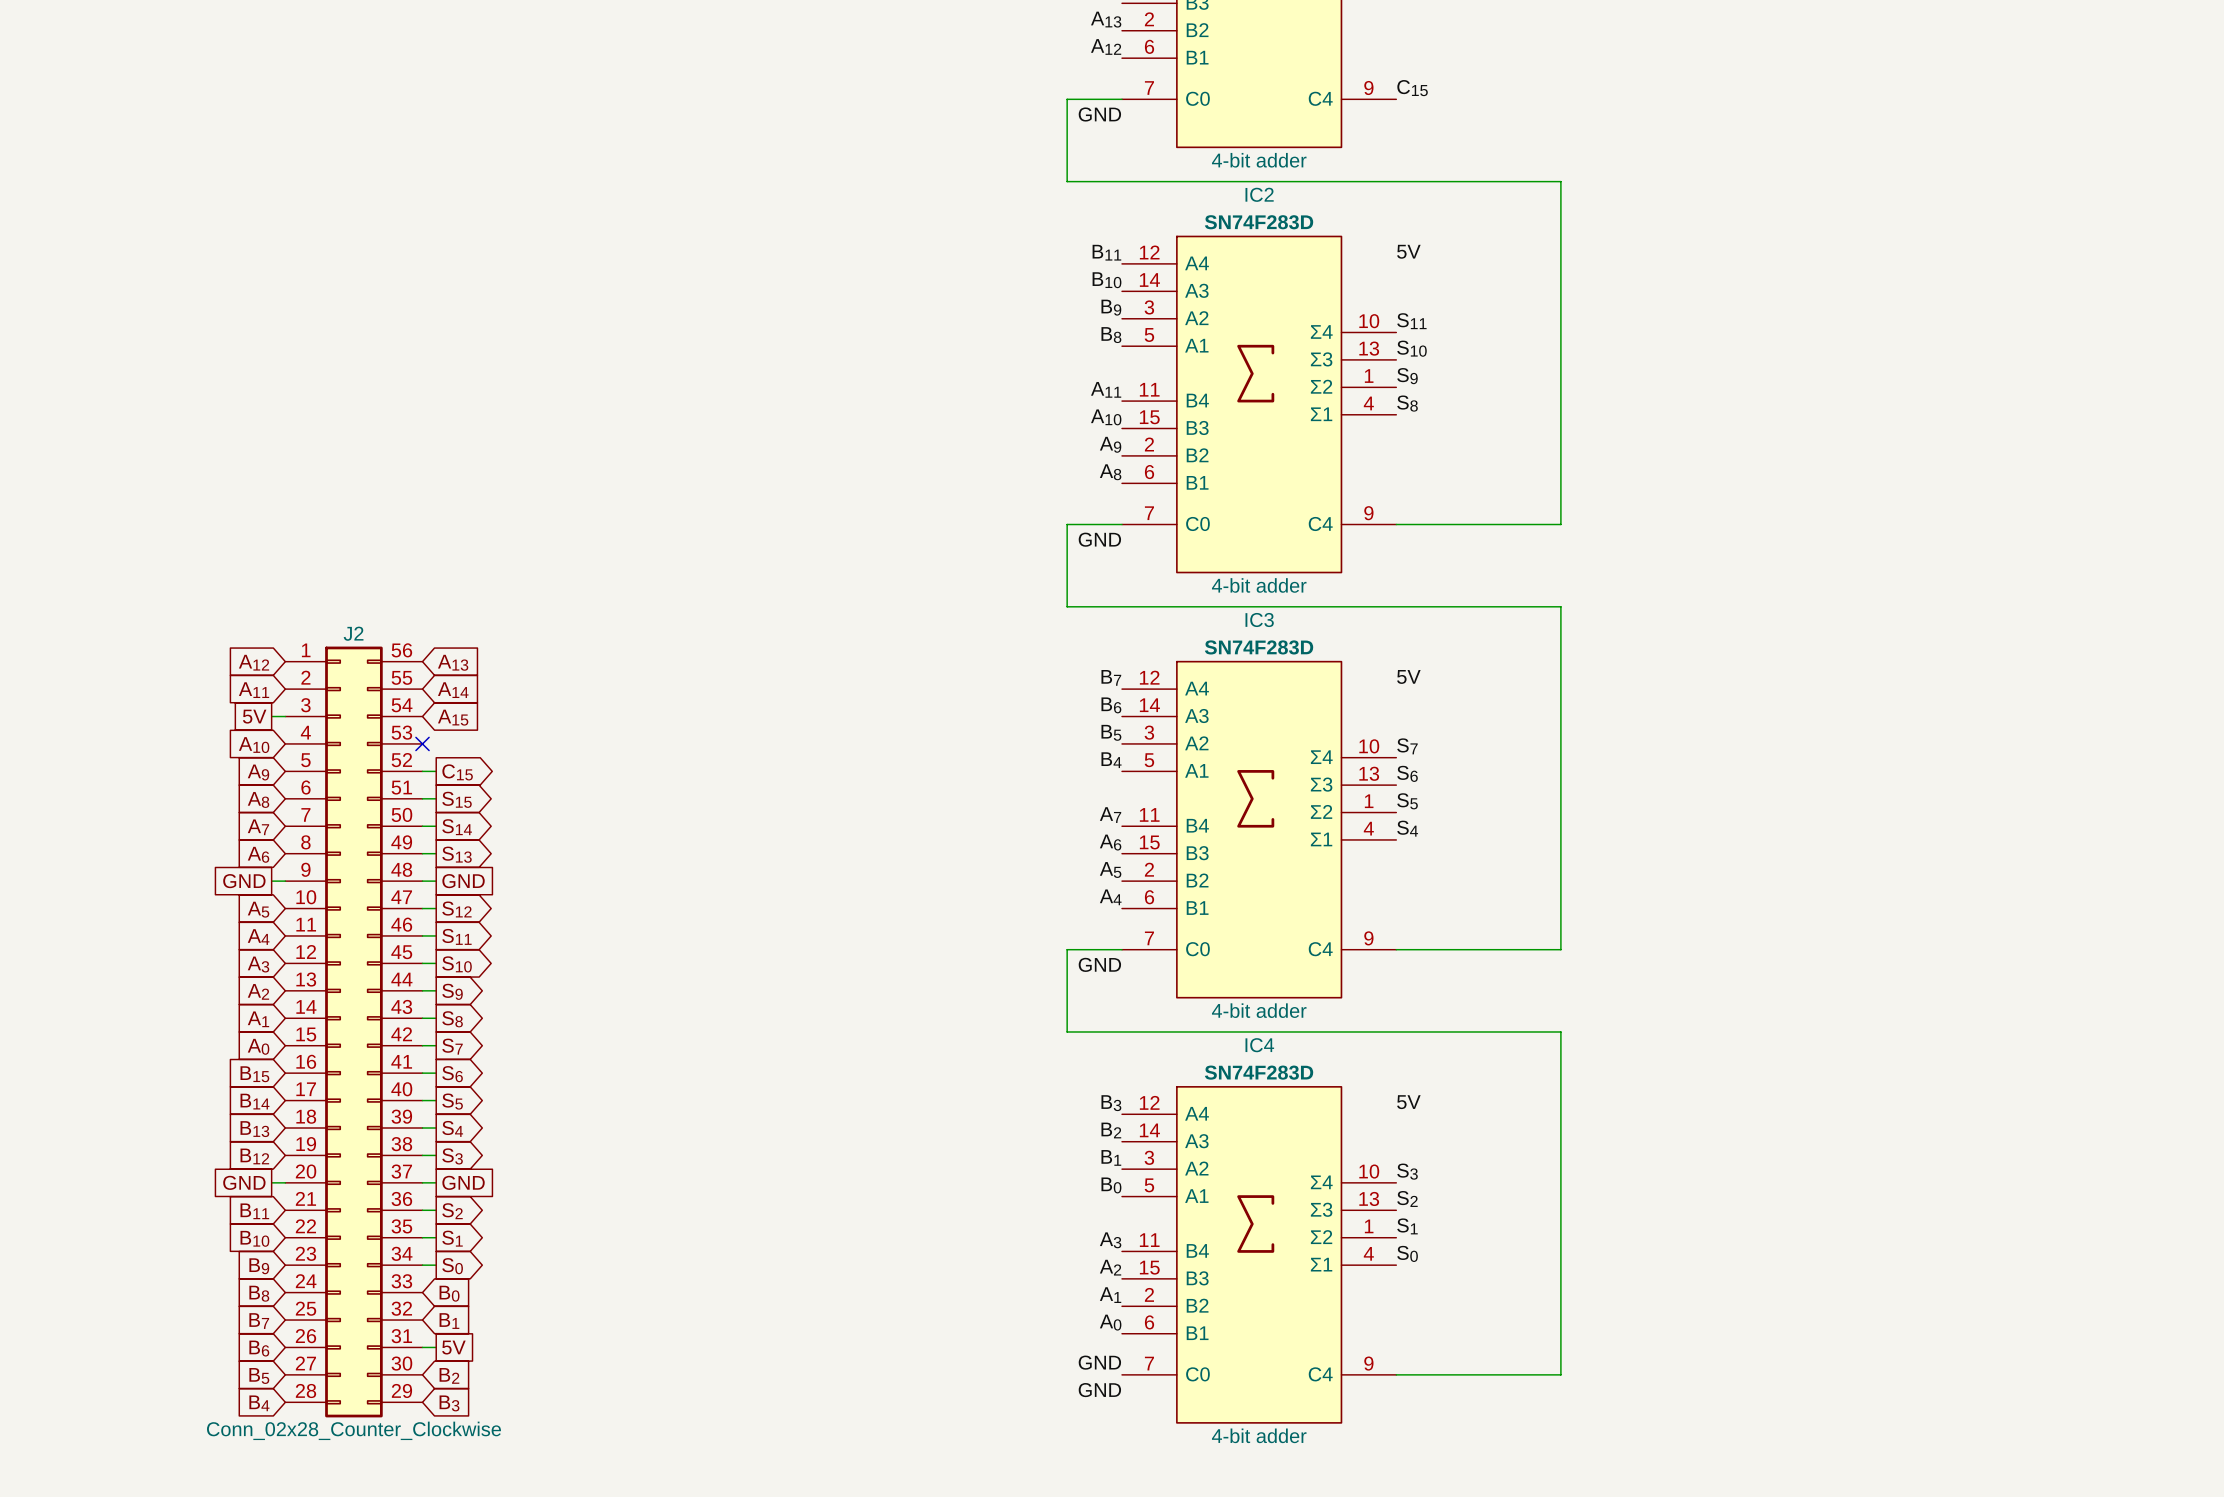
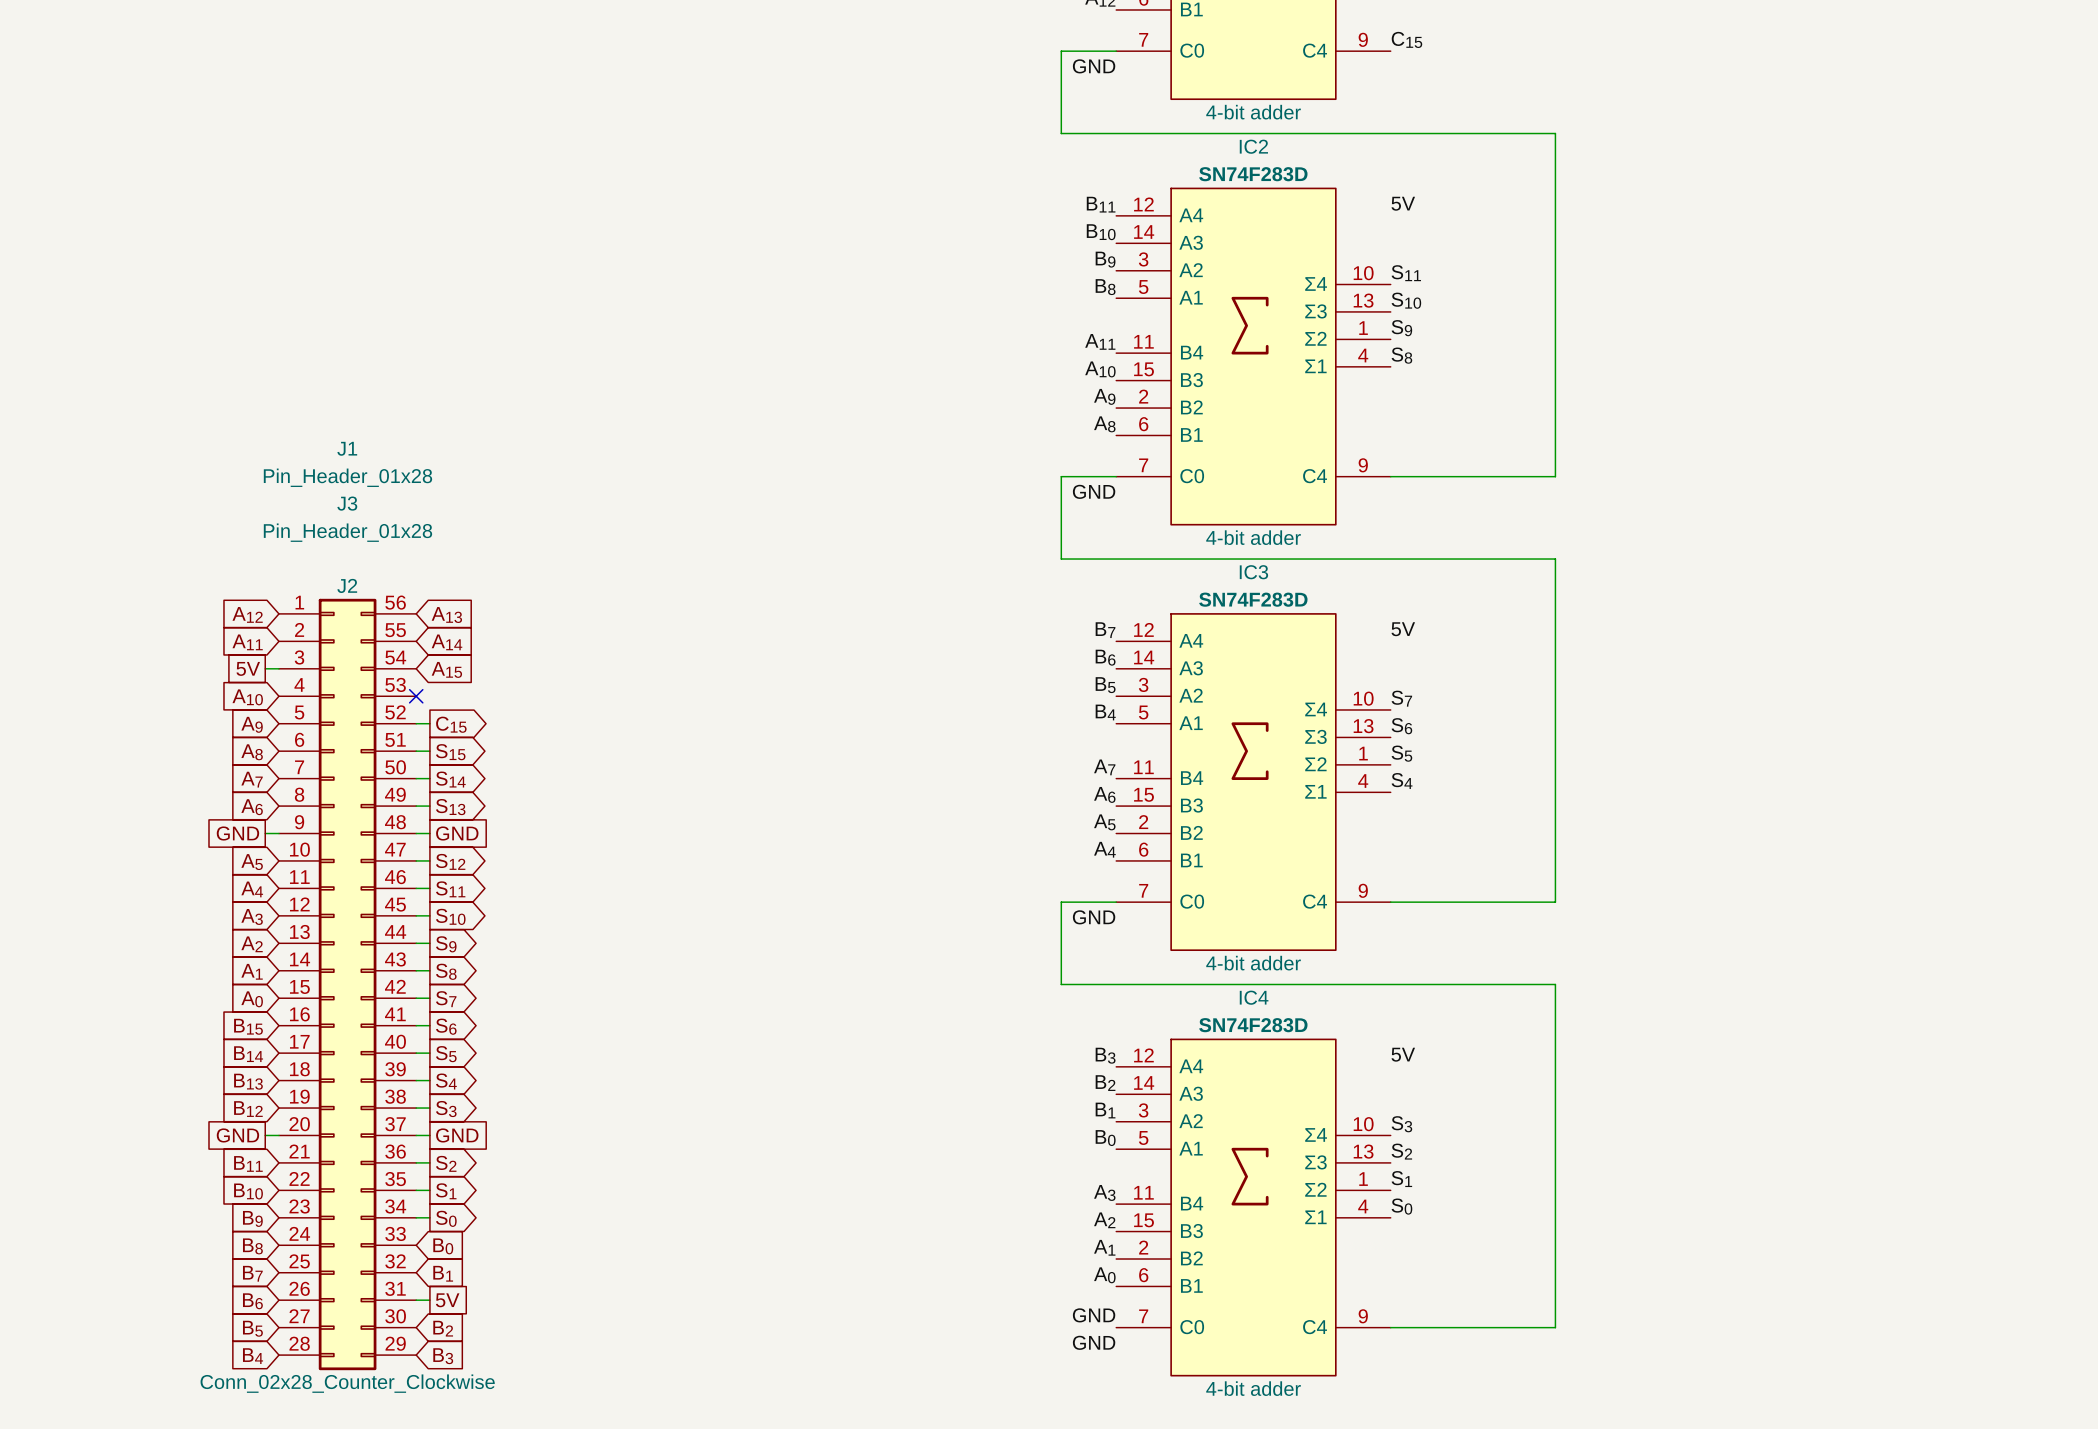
J1: none -> Pin_Header_01x28 (347, 464)
J3: none -> Pin_Header_01x28 (347, 519)

